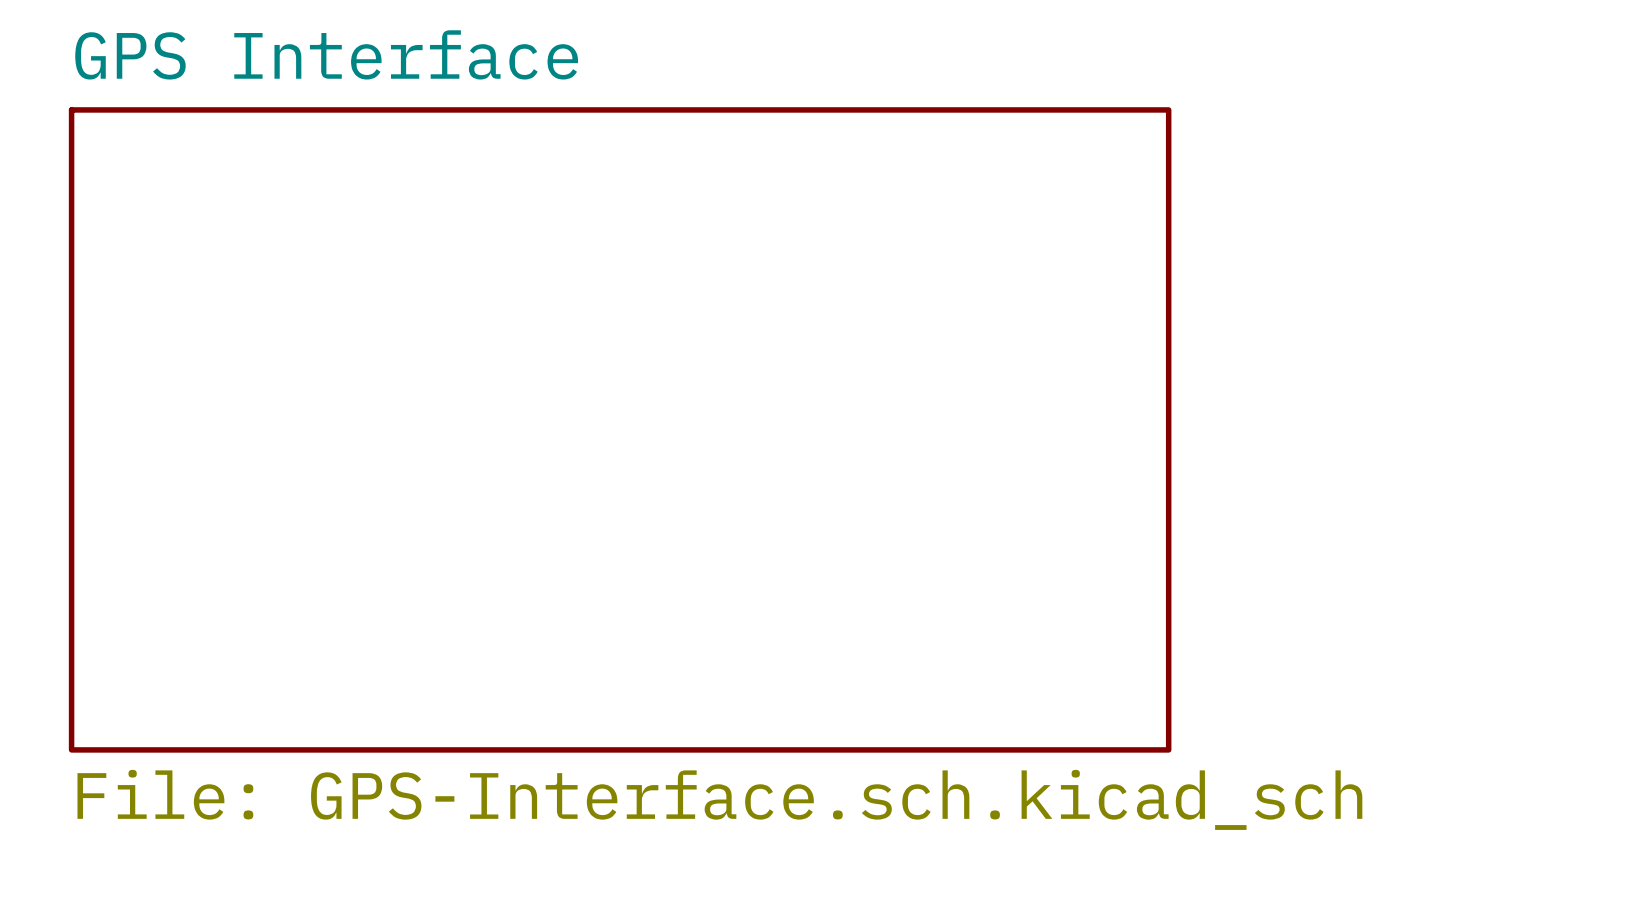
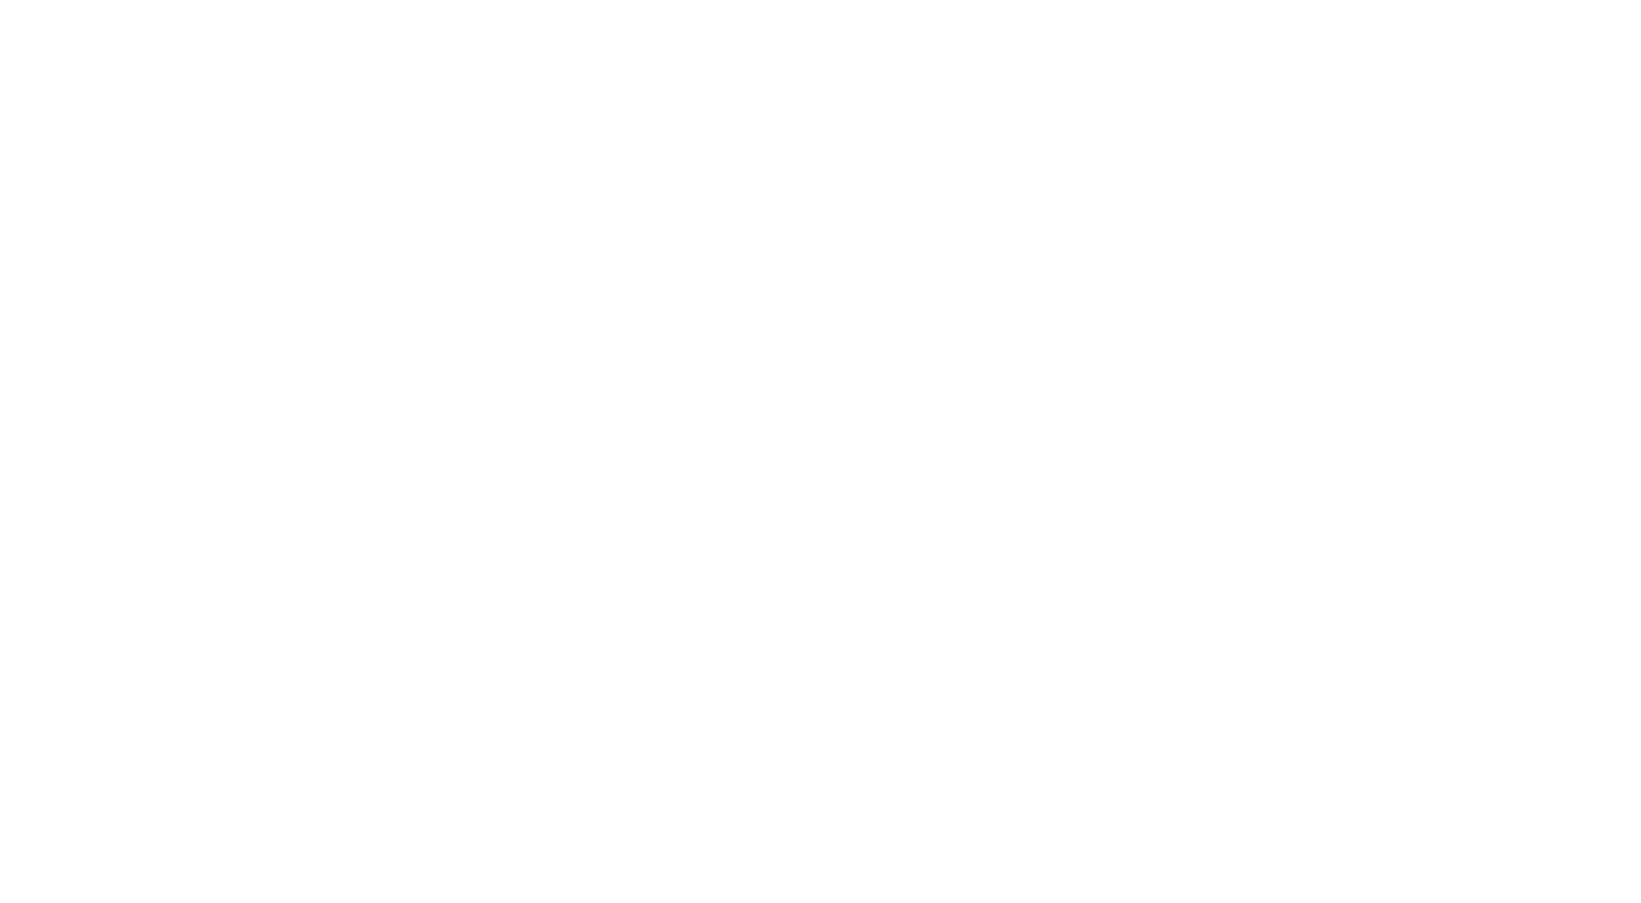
sheet GPS Interface: File: GPS-Interface.sch.kicad_sch (620, 429) -> none

